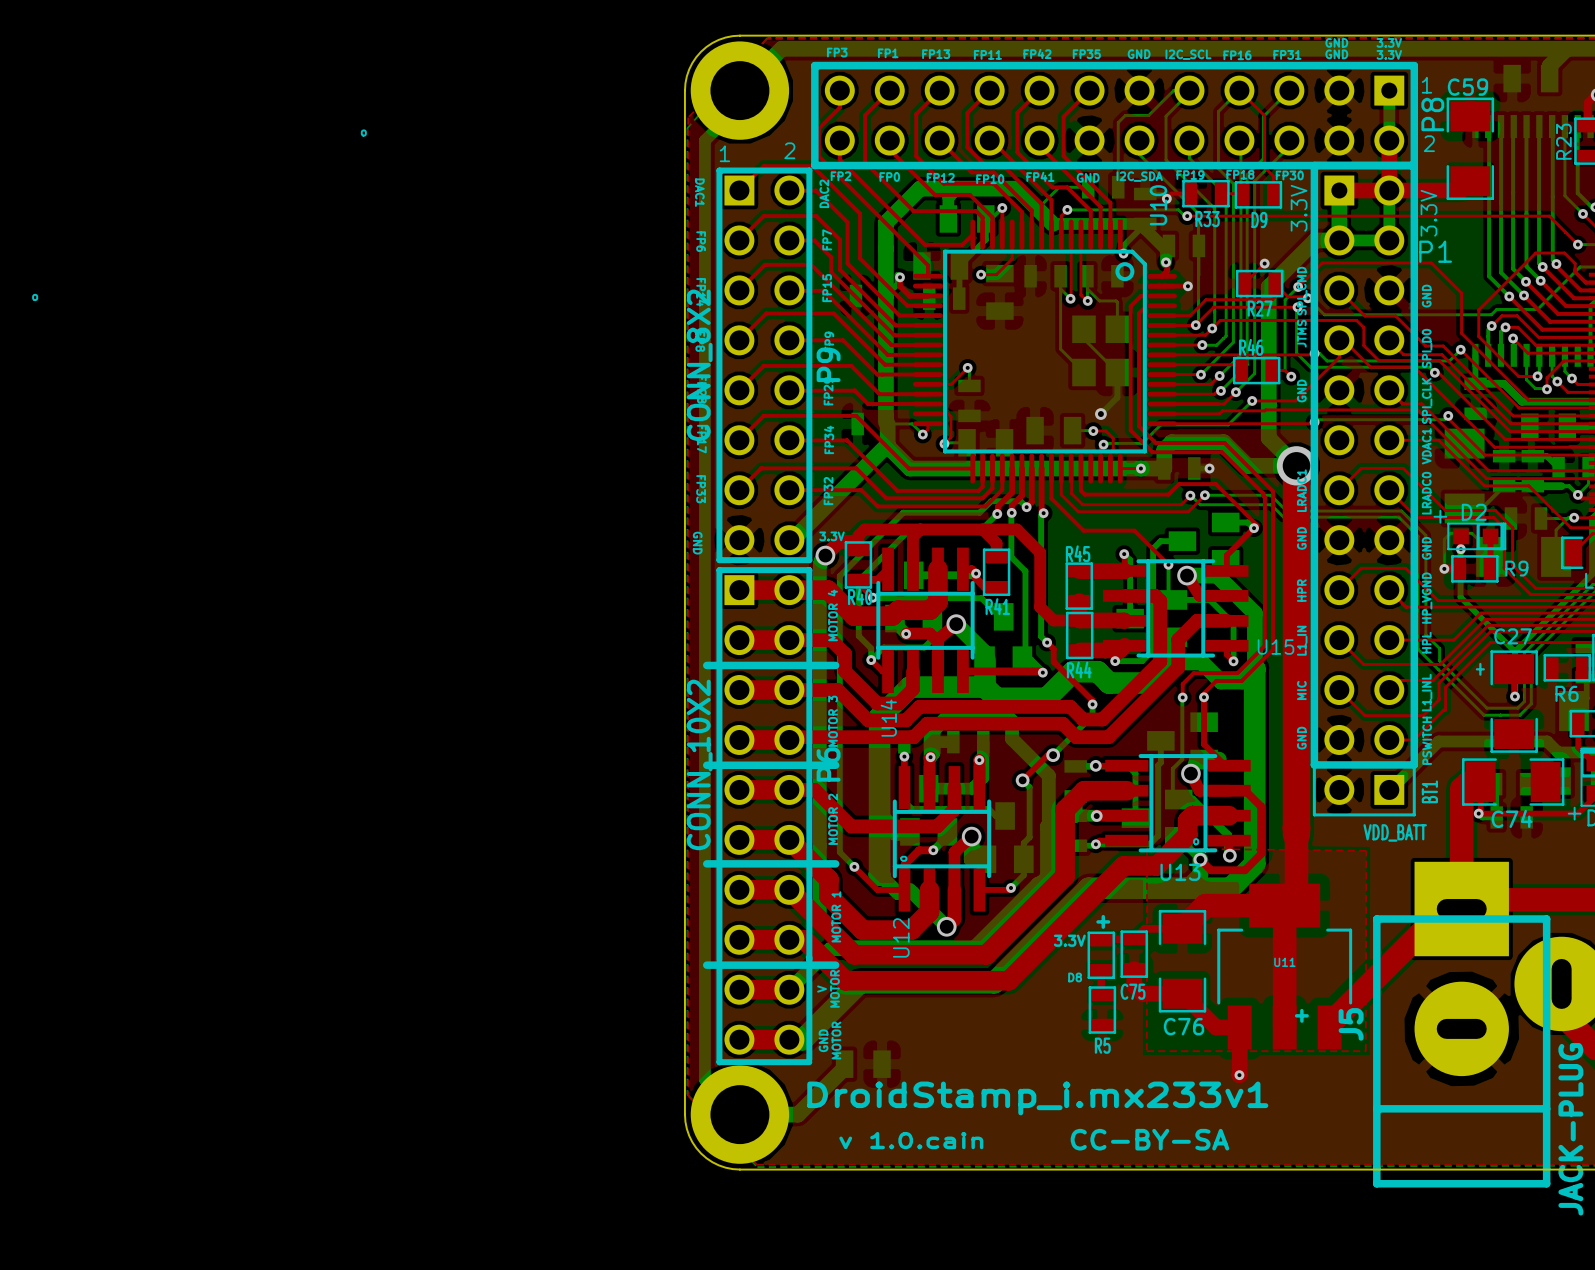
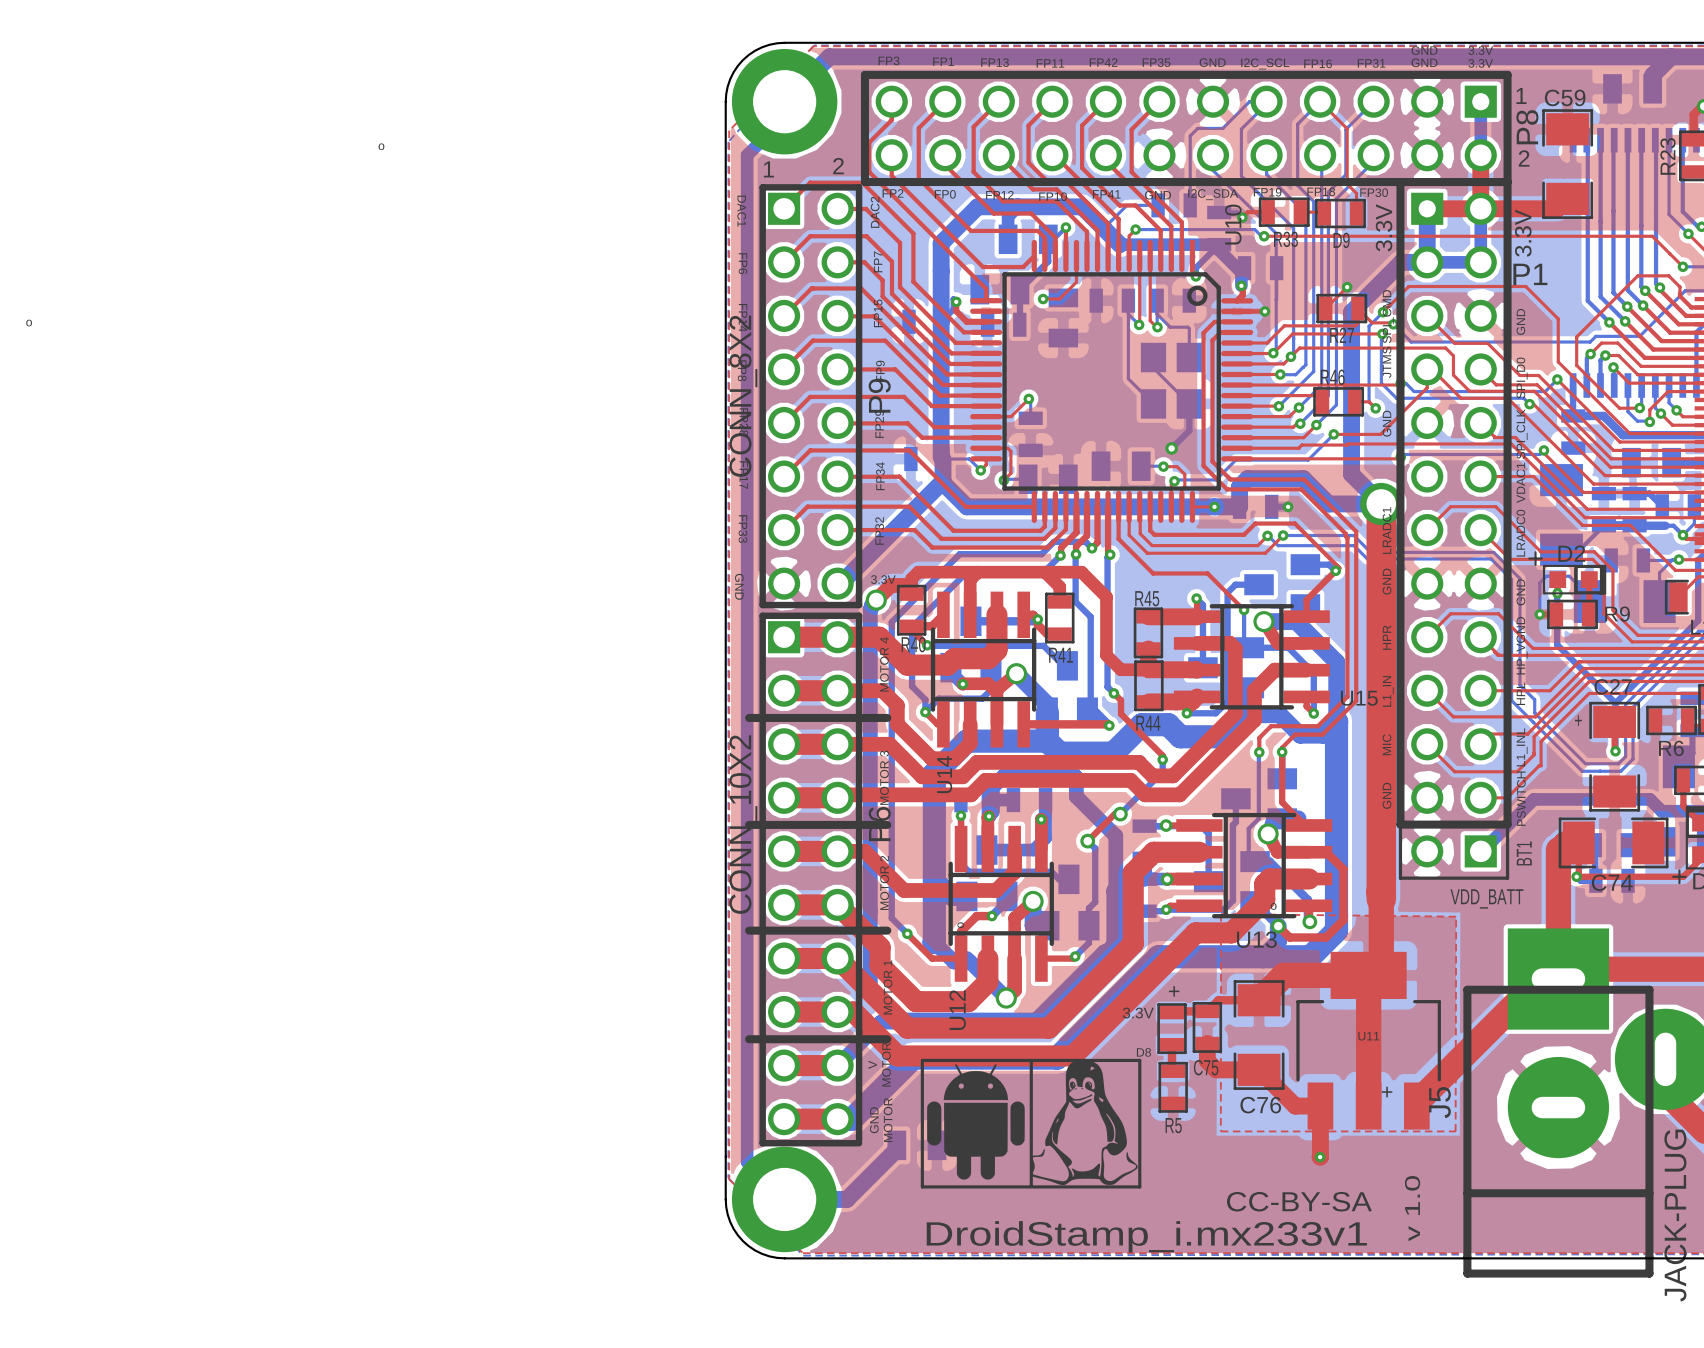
drawing: none -> [922, 1059, 1138, 1186]
line: none -> (922, 1060) (922, 1186) (1139, 1186) (1139, 1060) (923, 1060)
line: none -> (1031, 1060) (1031, 1185)
text position: DroidStamp_i.mx233v1 (1037, 1098) -> DroidStamp_i.mx233v1 (1146, 1236)
text: none -> v 1.0 (1412, 1208)
text position: CC-BY-SA (1149, 1139) -> CC-BY-SA (1299, 1201)
text: v 1.0.cain (911, 1140) -> none

